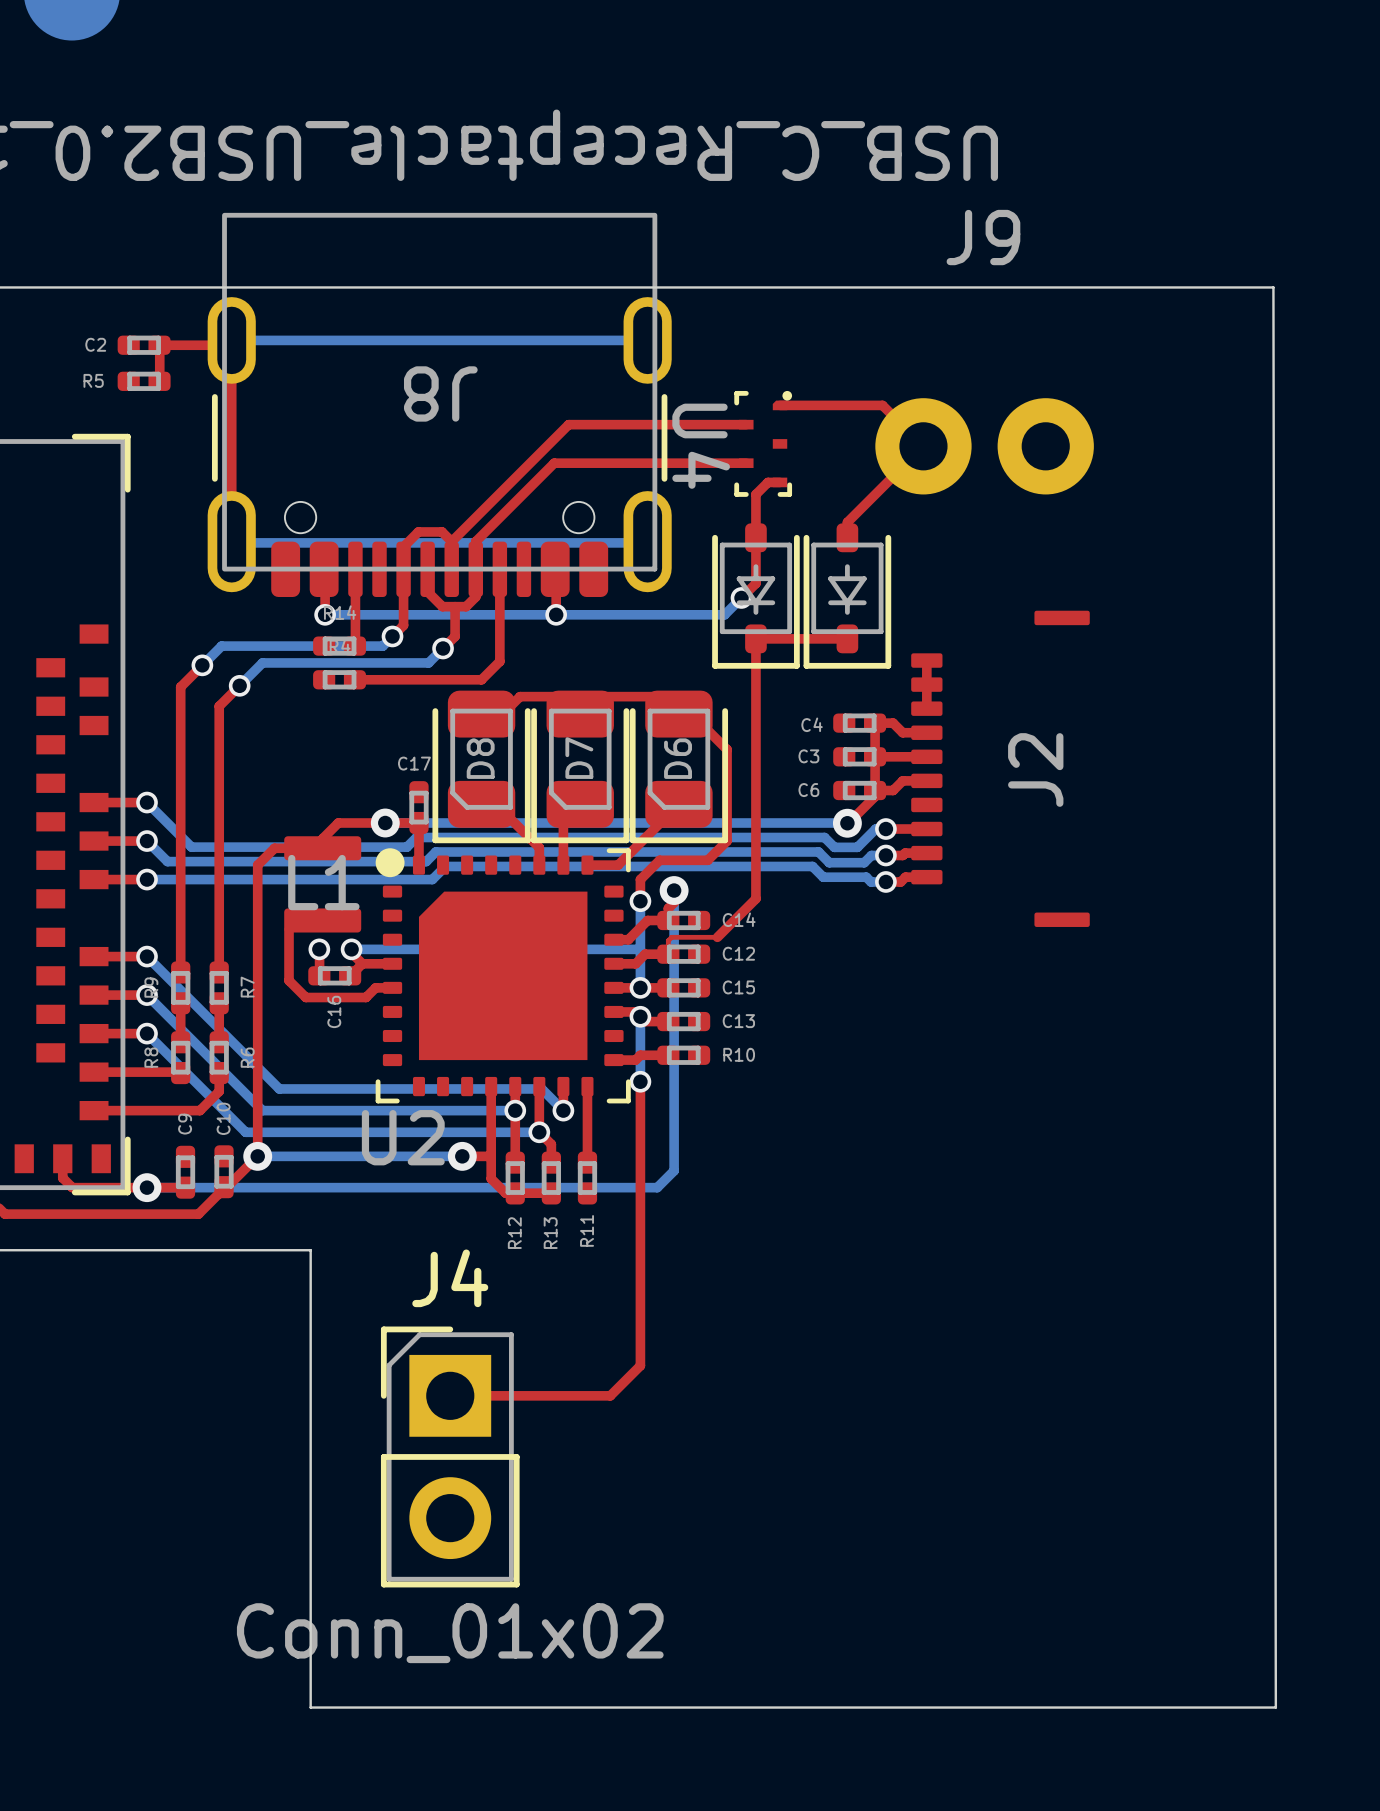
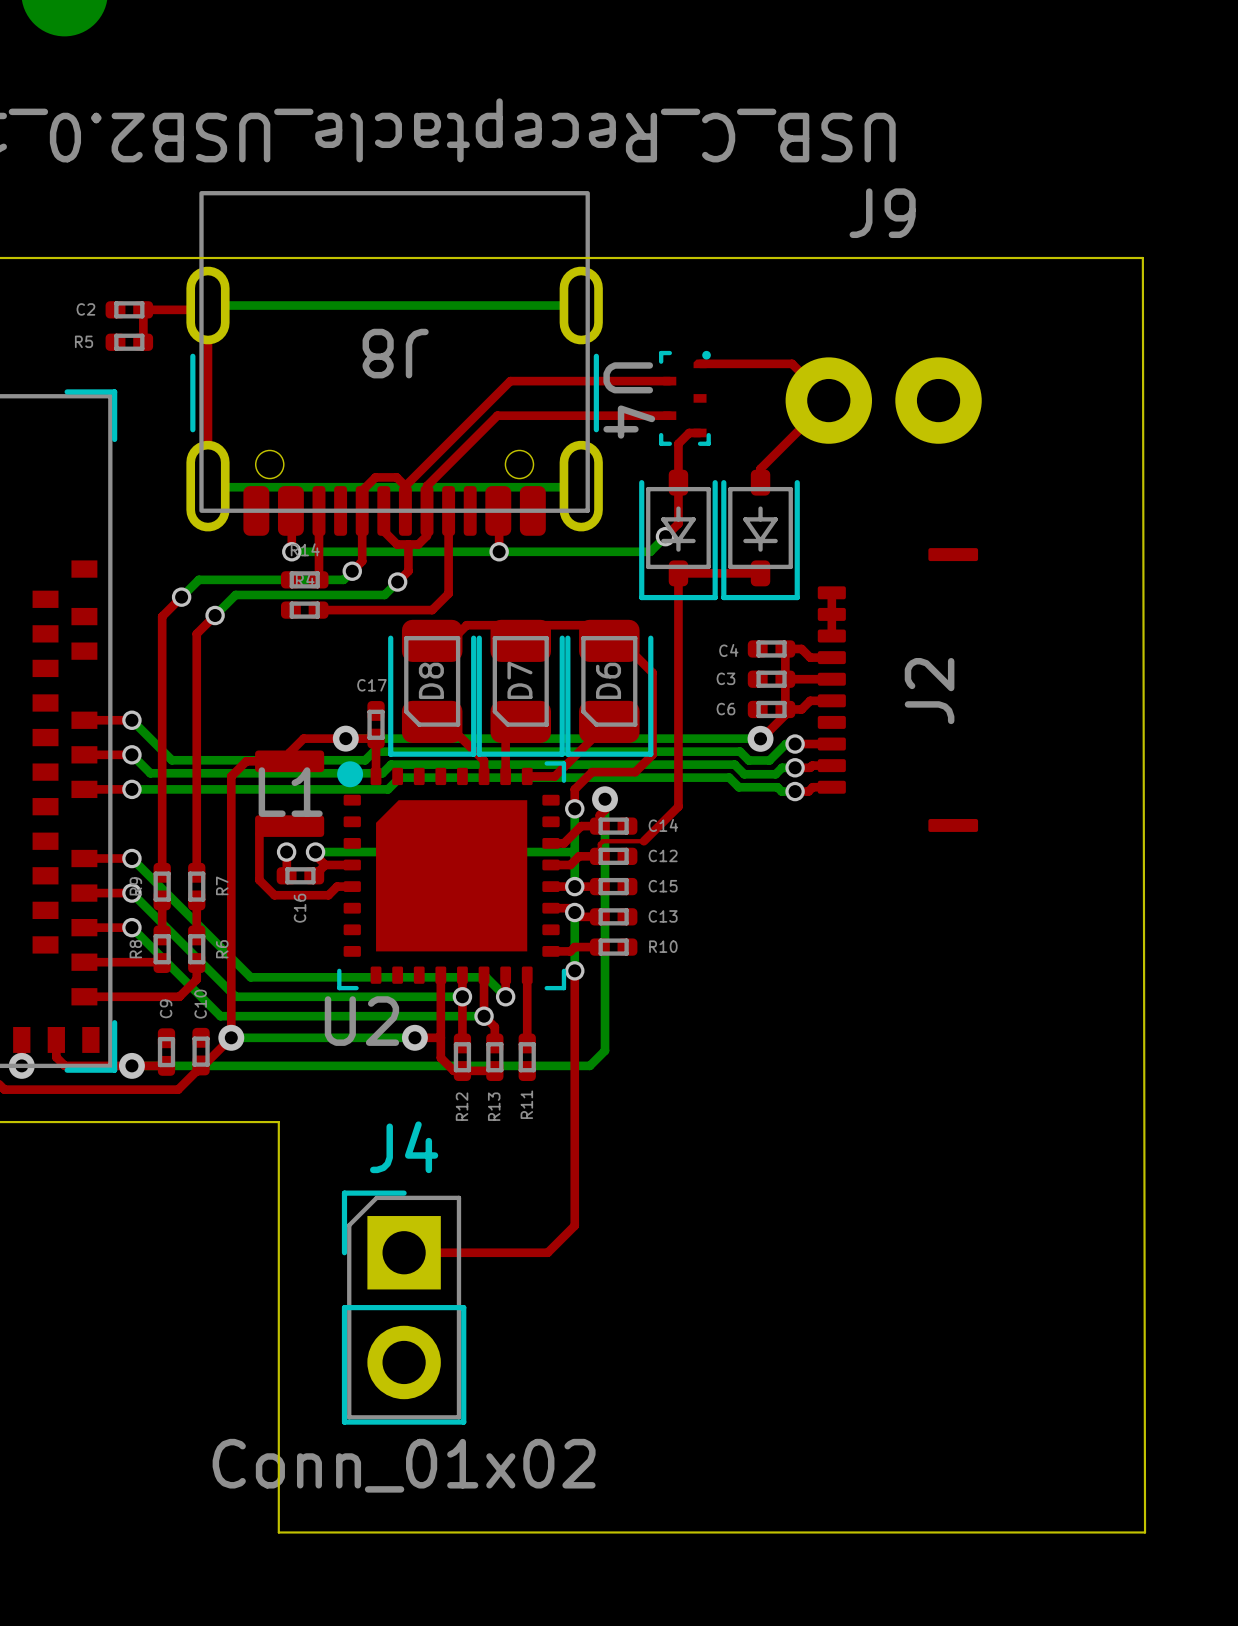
via: none -> (21, 1065)

